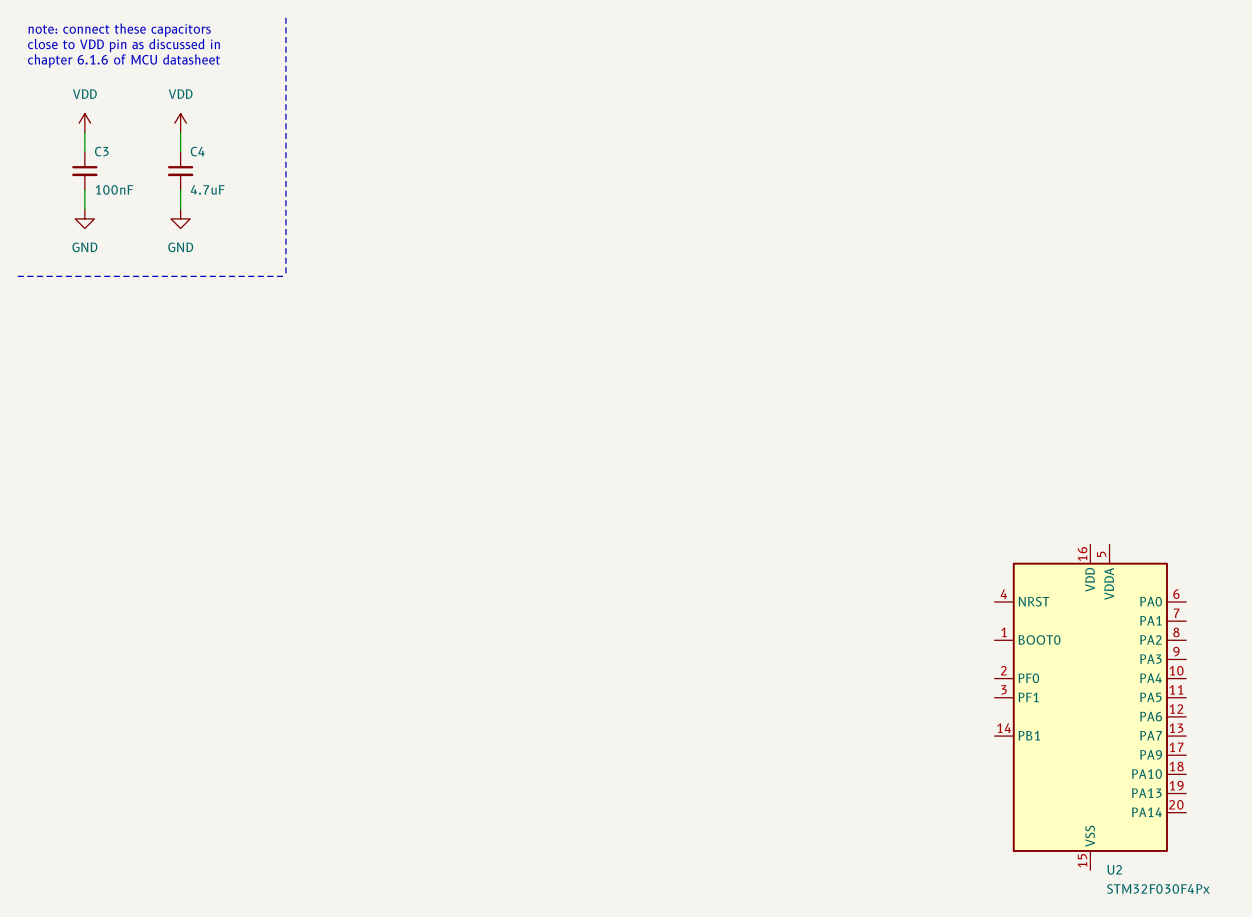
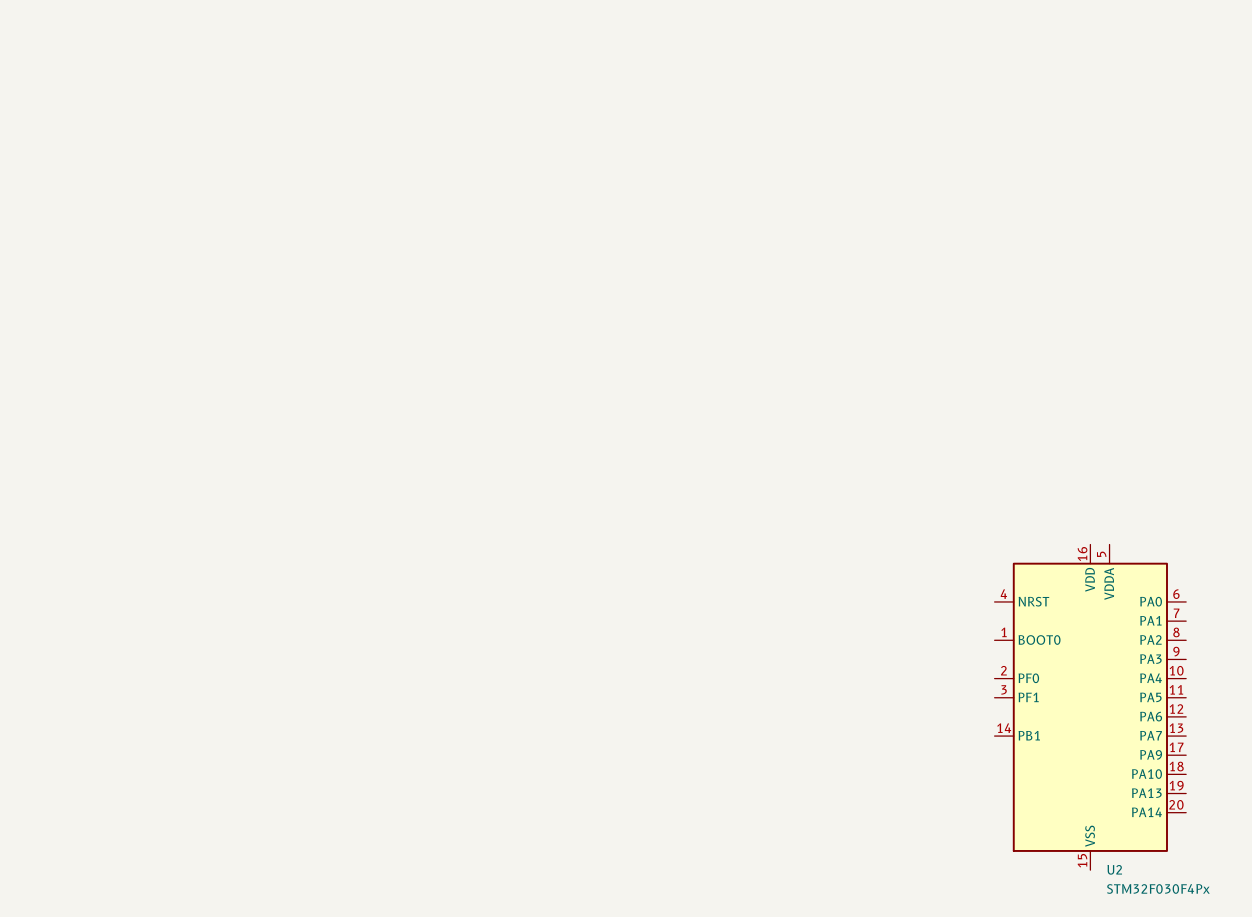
line: (285, 17) (285, 276) (17, 276) -> none
text: note: connect these capacitors (119, 30) -> none
text: close to VDD pin as discussed in (123, 45) -> none
text: chapter 6.1.6 of MCU datasheet (124, 60) -> none
power symbol: VDD (84, 123) -> none
power symbol: VDD (180, 123) -> none
wire: (84, 132) (84, 151) -> none
wire: (180, 132) (180, 151) -> none
C3: 100nF (84, 171) -> none
C4: 4.7uF (180, 171) -> none
wire: (84, 190) (84, 209) -> none
wire: (180, 190) (180, 209) -> none
power symbol: GND (84, 218) -> none
power symbol: GND (180, 218) -> none

